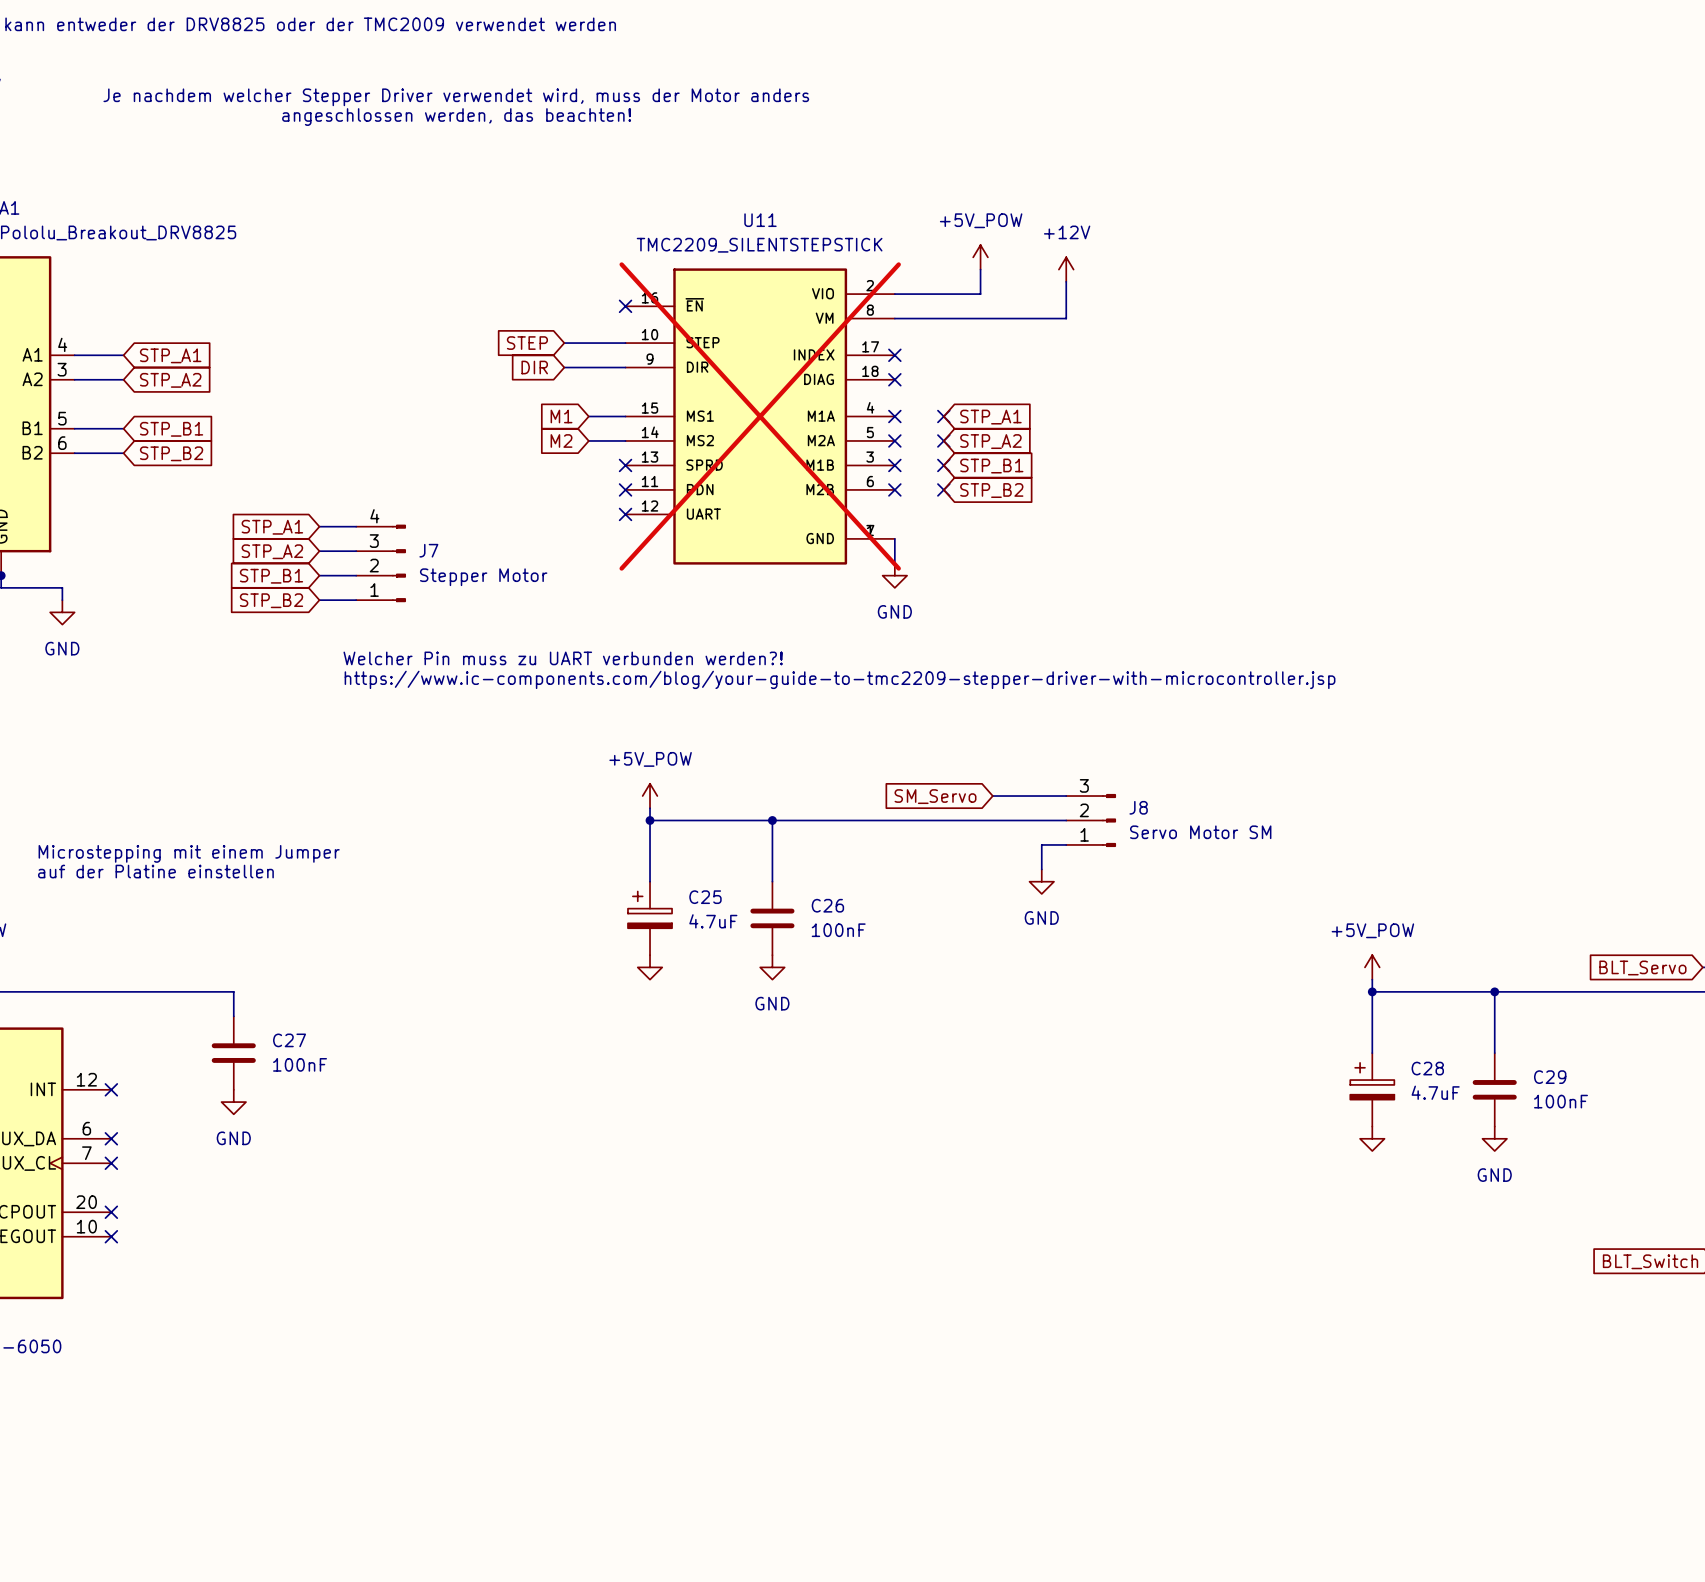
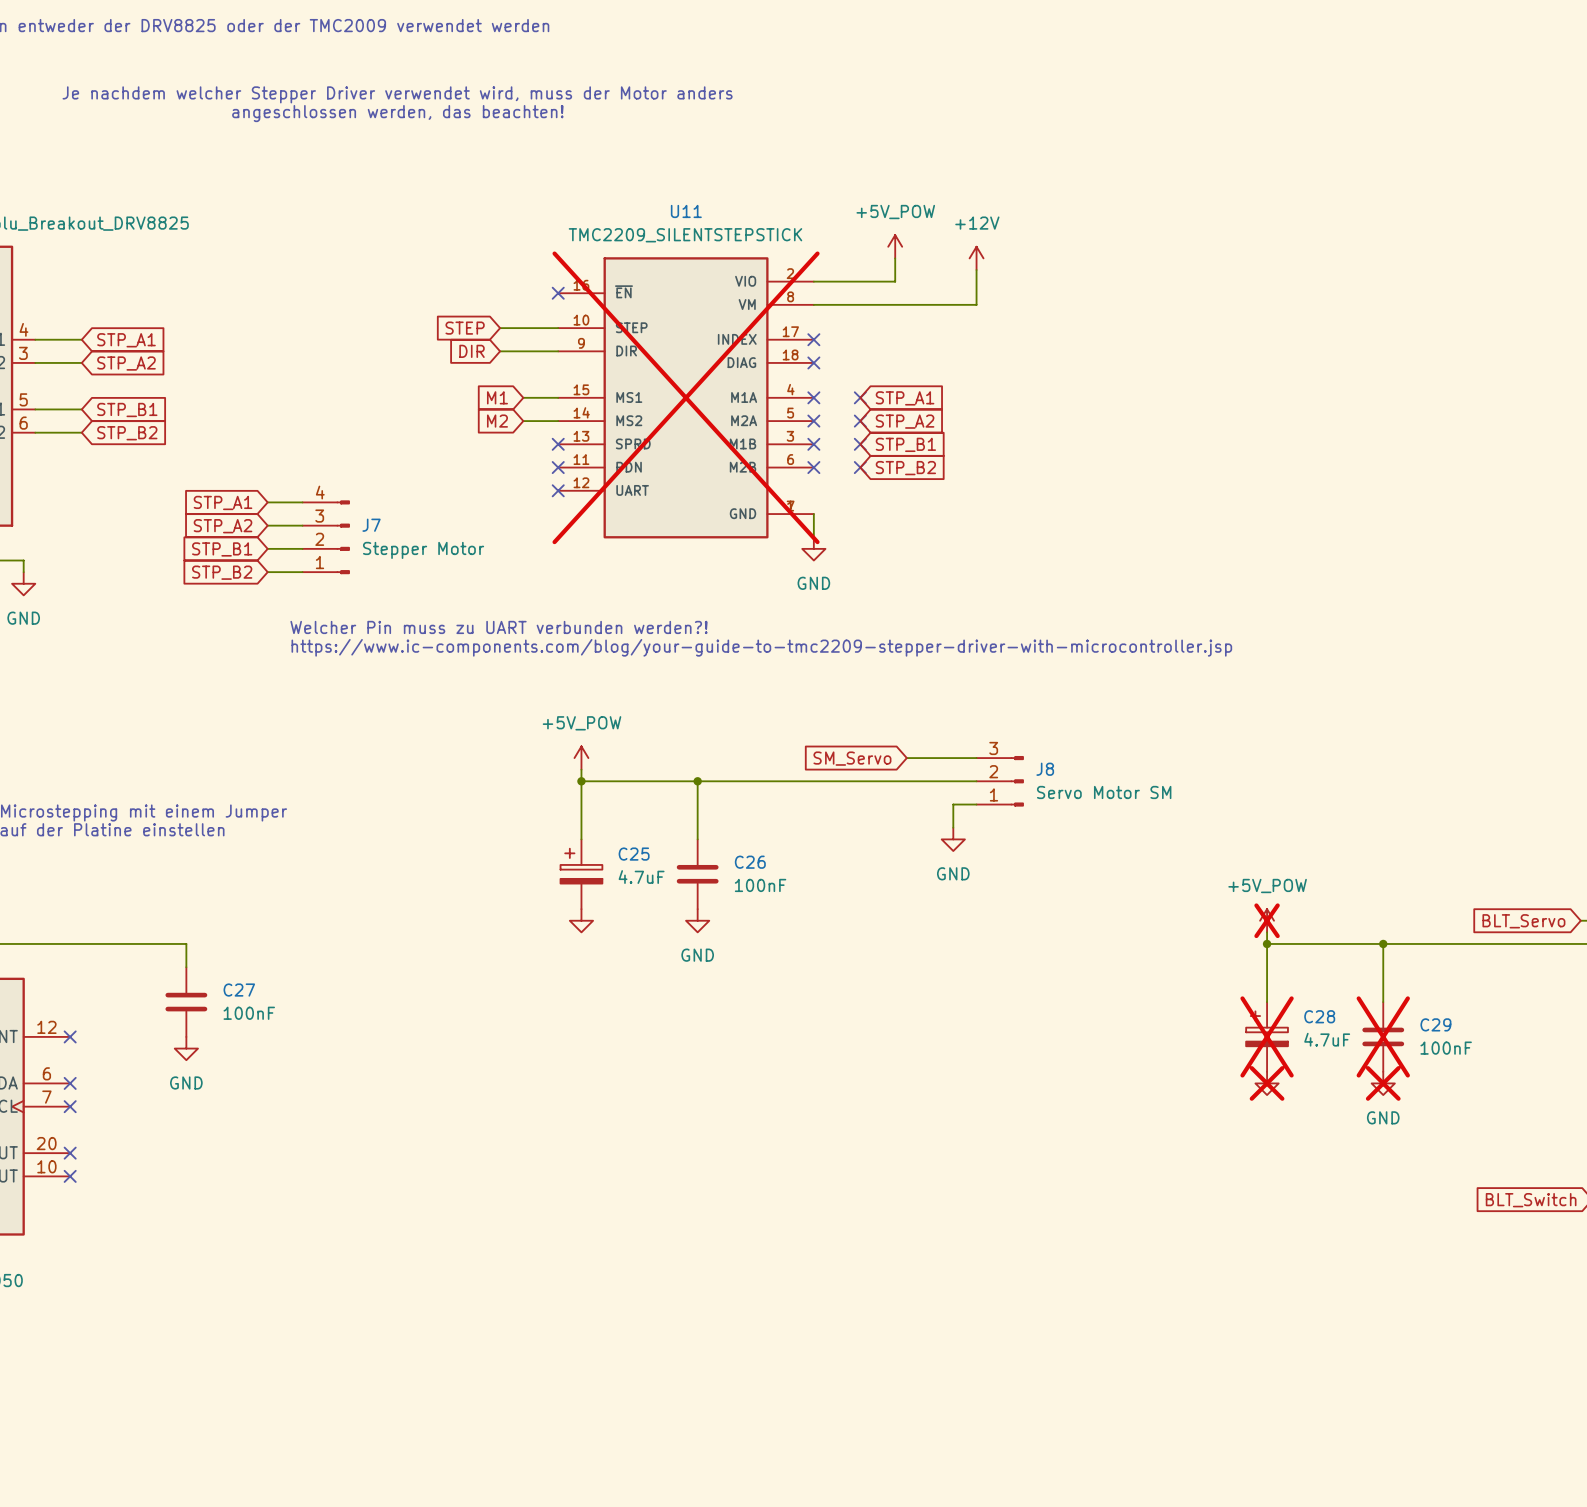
power symbol do-not-place cross: none -> (1267, 920)
C28 do-not-place cross: none -> (1267, 1036)
C29 do-not-place cross: none -> (1383, 1036)
power symbol do-not-place cross: none -> (1267, 1083)
power symbol do-not-place cross: none -> (1383, 1083)

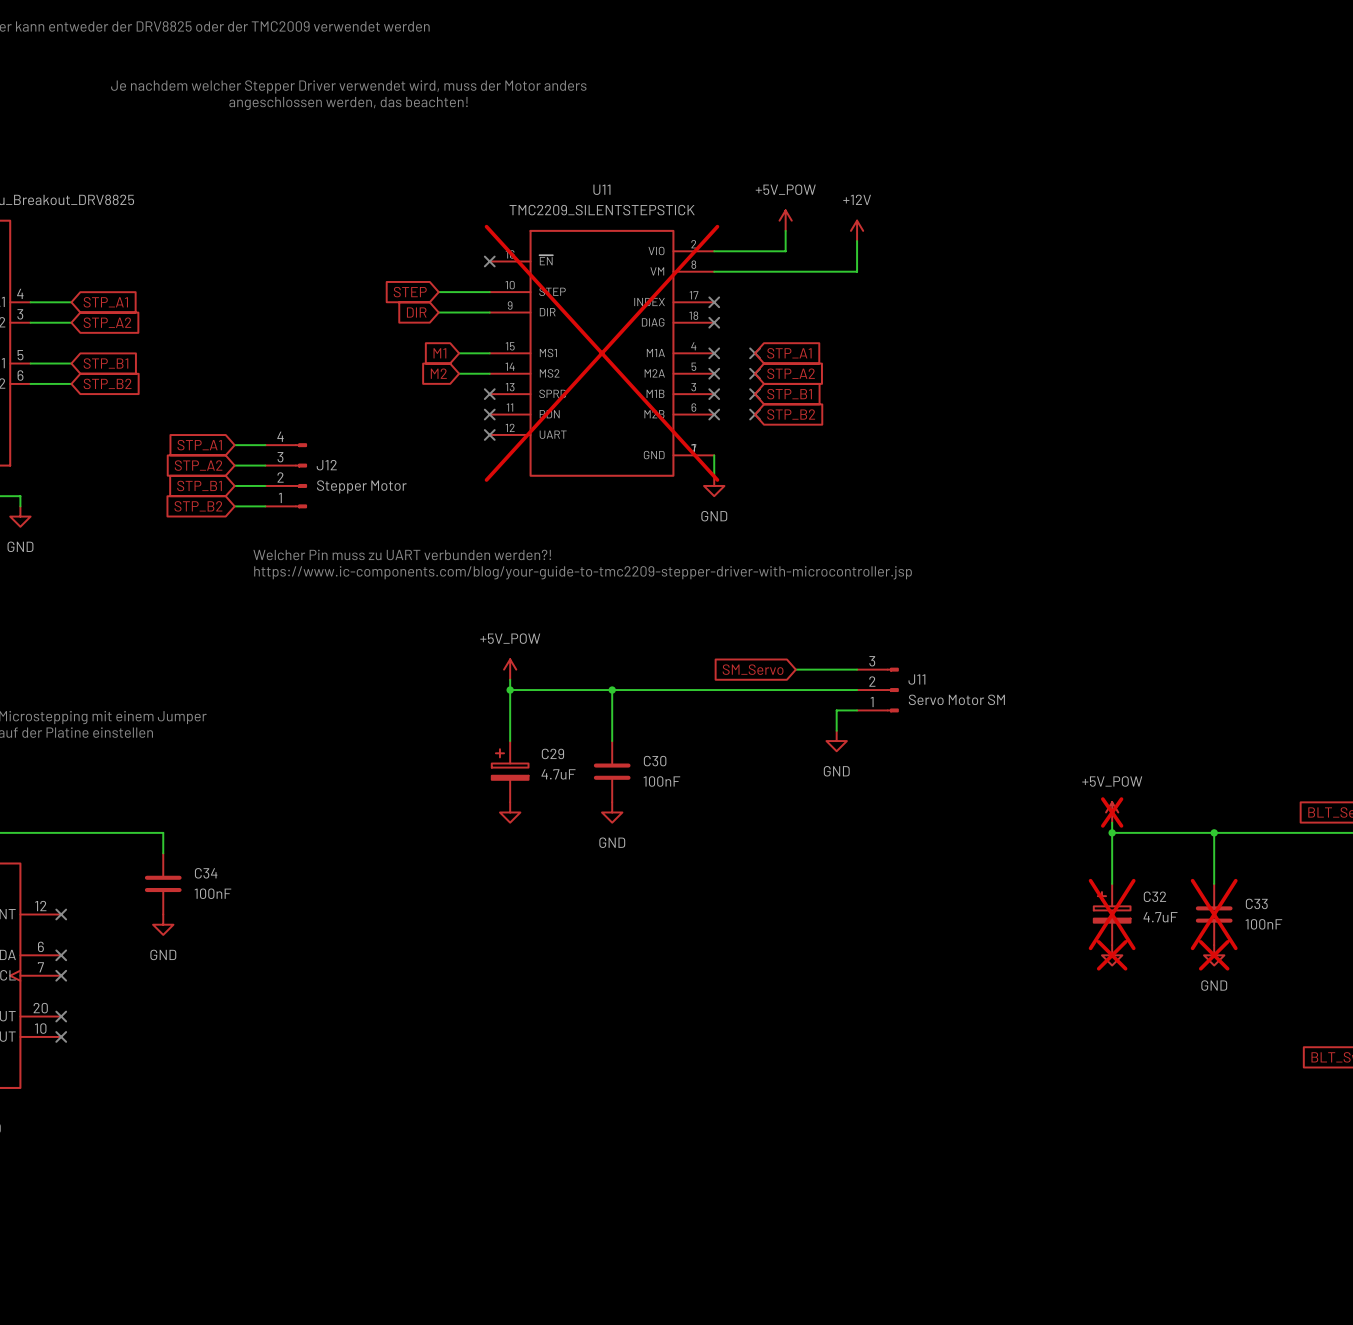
J7 name: J7 (371, 525) -> J12 (326, 465)
J8 name: J8 (1045, 769) -> J11 (916, 679)
C25 name: C25 (634, 854) -> C29 (552, 753)
C26 name: C26 (750, 862) -> C30 (655, 761)
C27 name: C27 (239, 990) -> C34 (206, 873)
C28 name: C28 (1319, 1016) -> C32 (1154, 896)
C29 name: C29 (1435, 1024) -> C33 (1256, 903)

